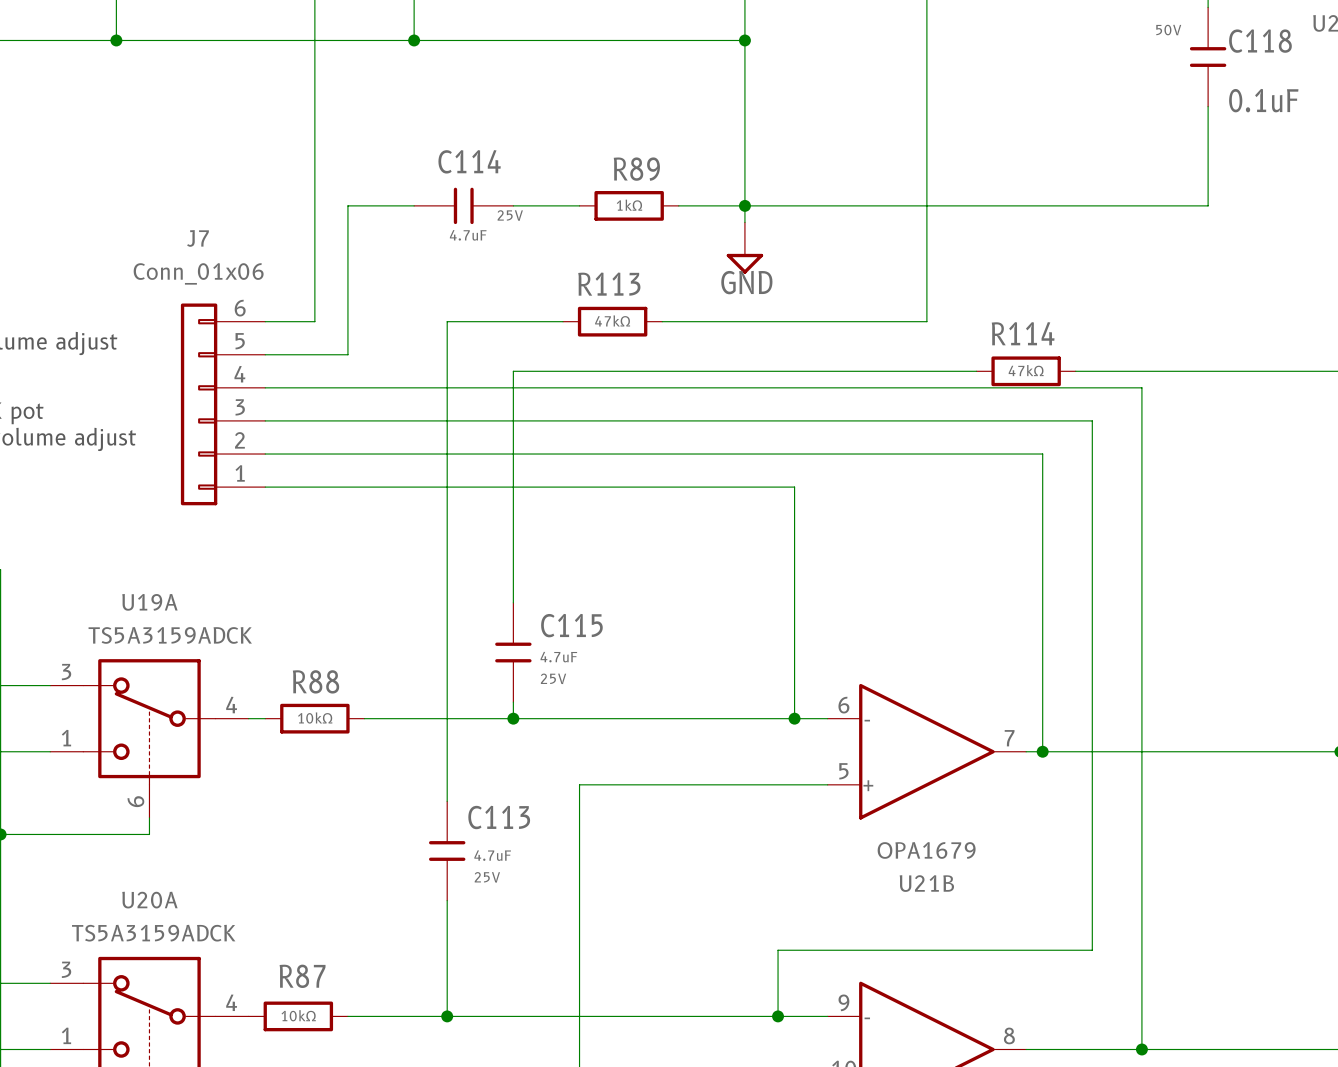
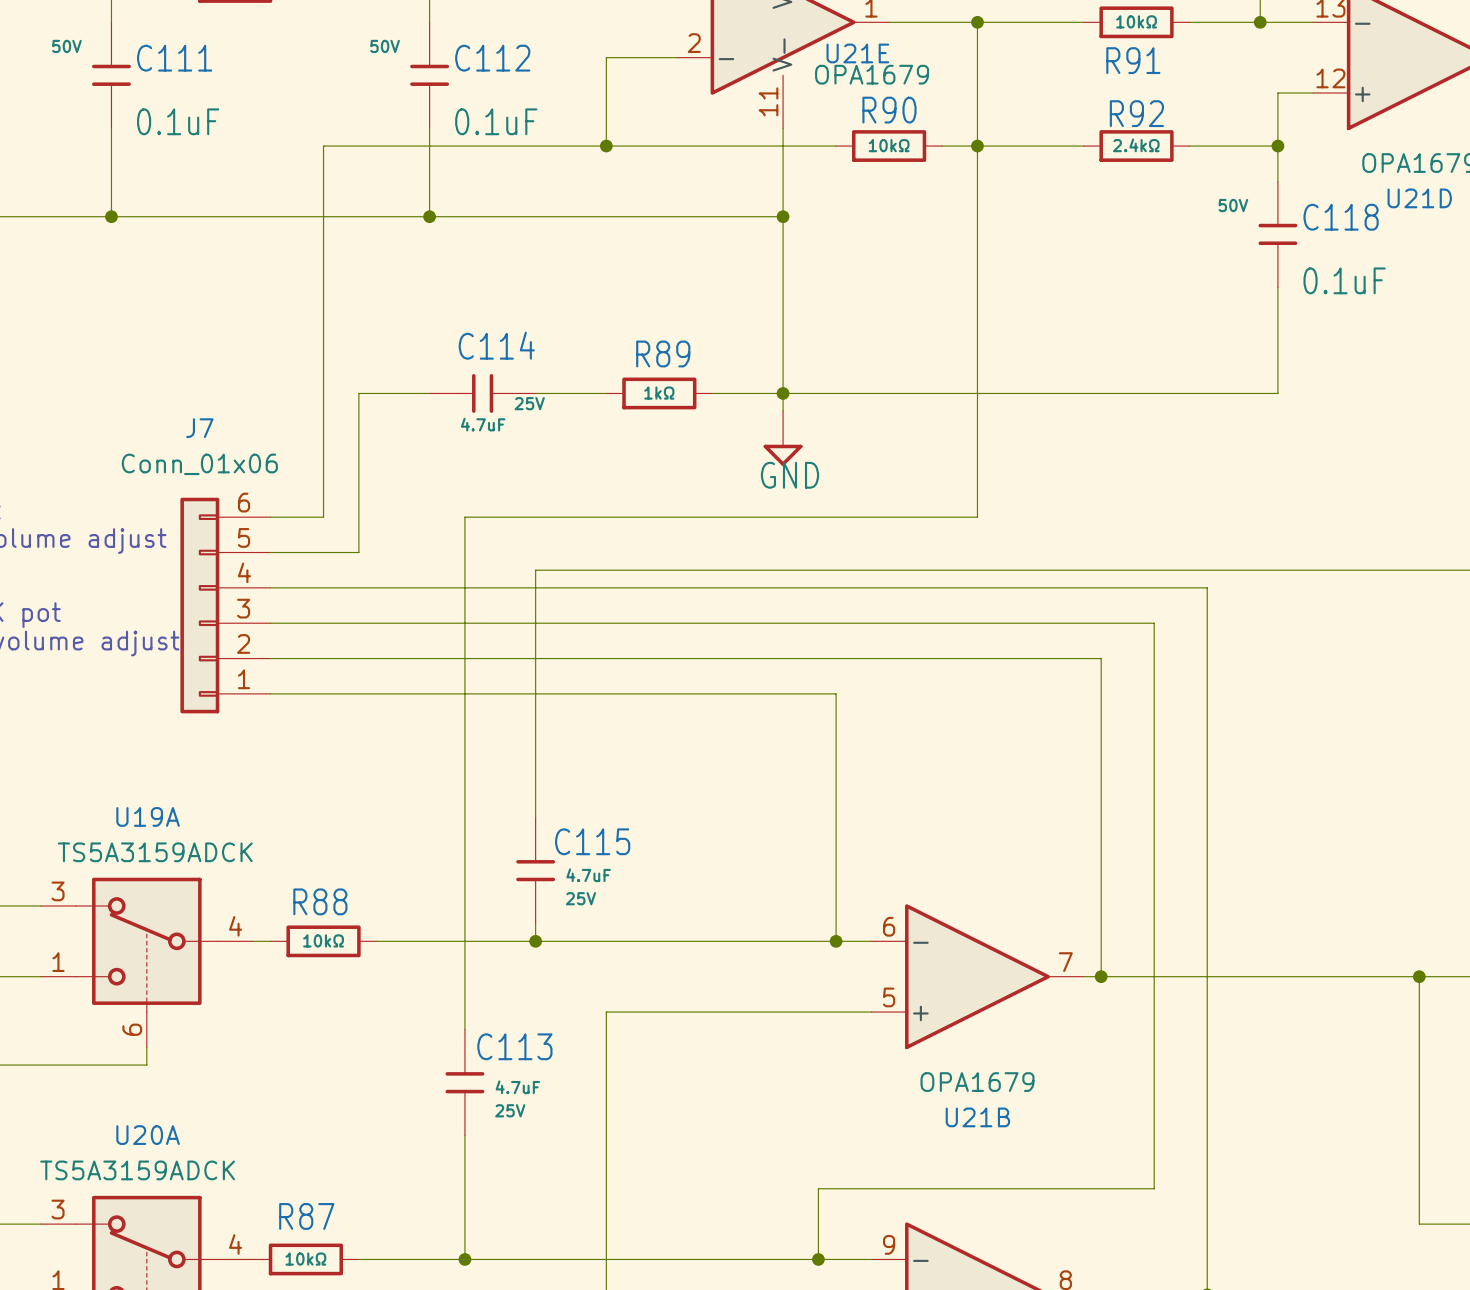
wire: none -> (588, 517) (694, 517)
R113: 47kΩ (612, 321) -> none
wire: none -> (1030, 570) (1136, 570)
R114: 47kΩ (1026, 371) -> none

